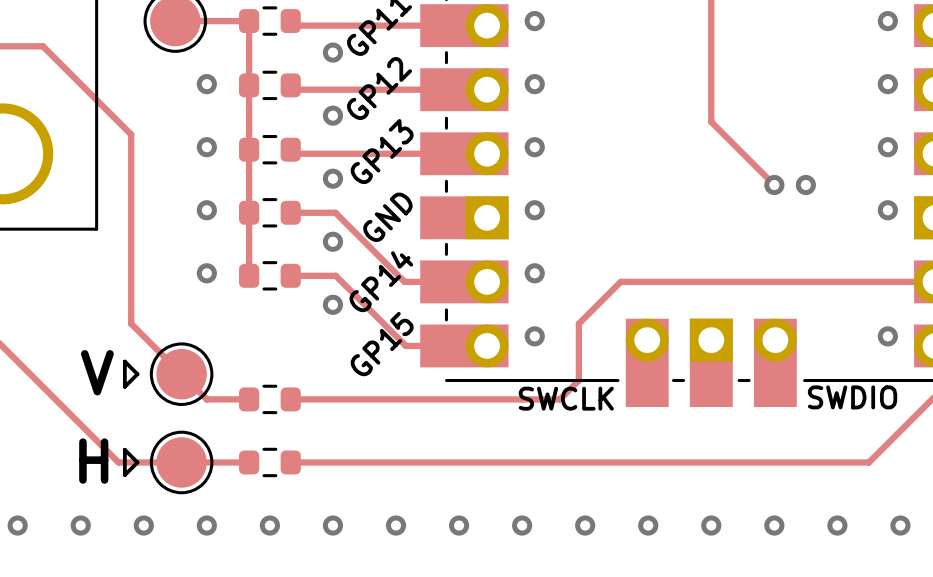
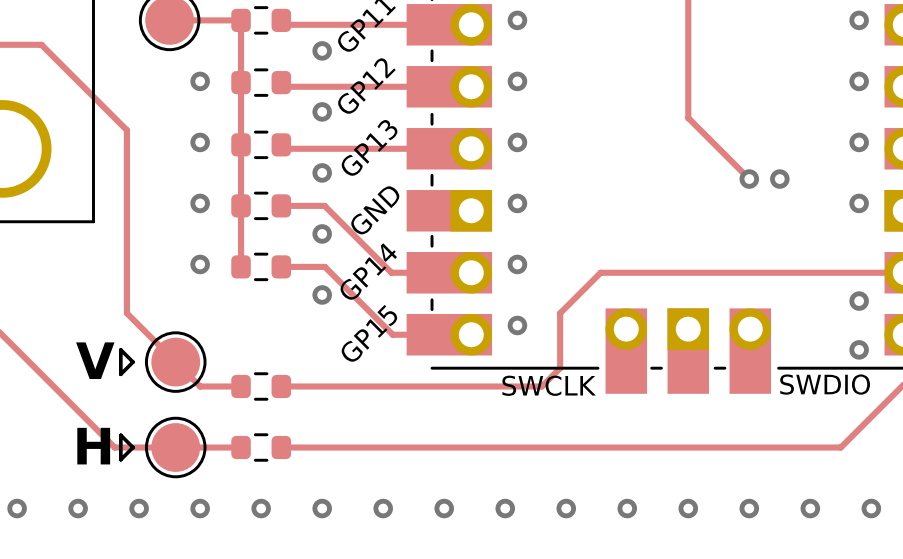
via: none -> (859, 301)
via: (887, 336) -> none
via: none -> (859, 349)

